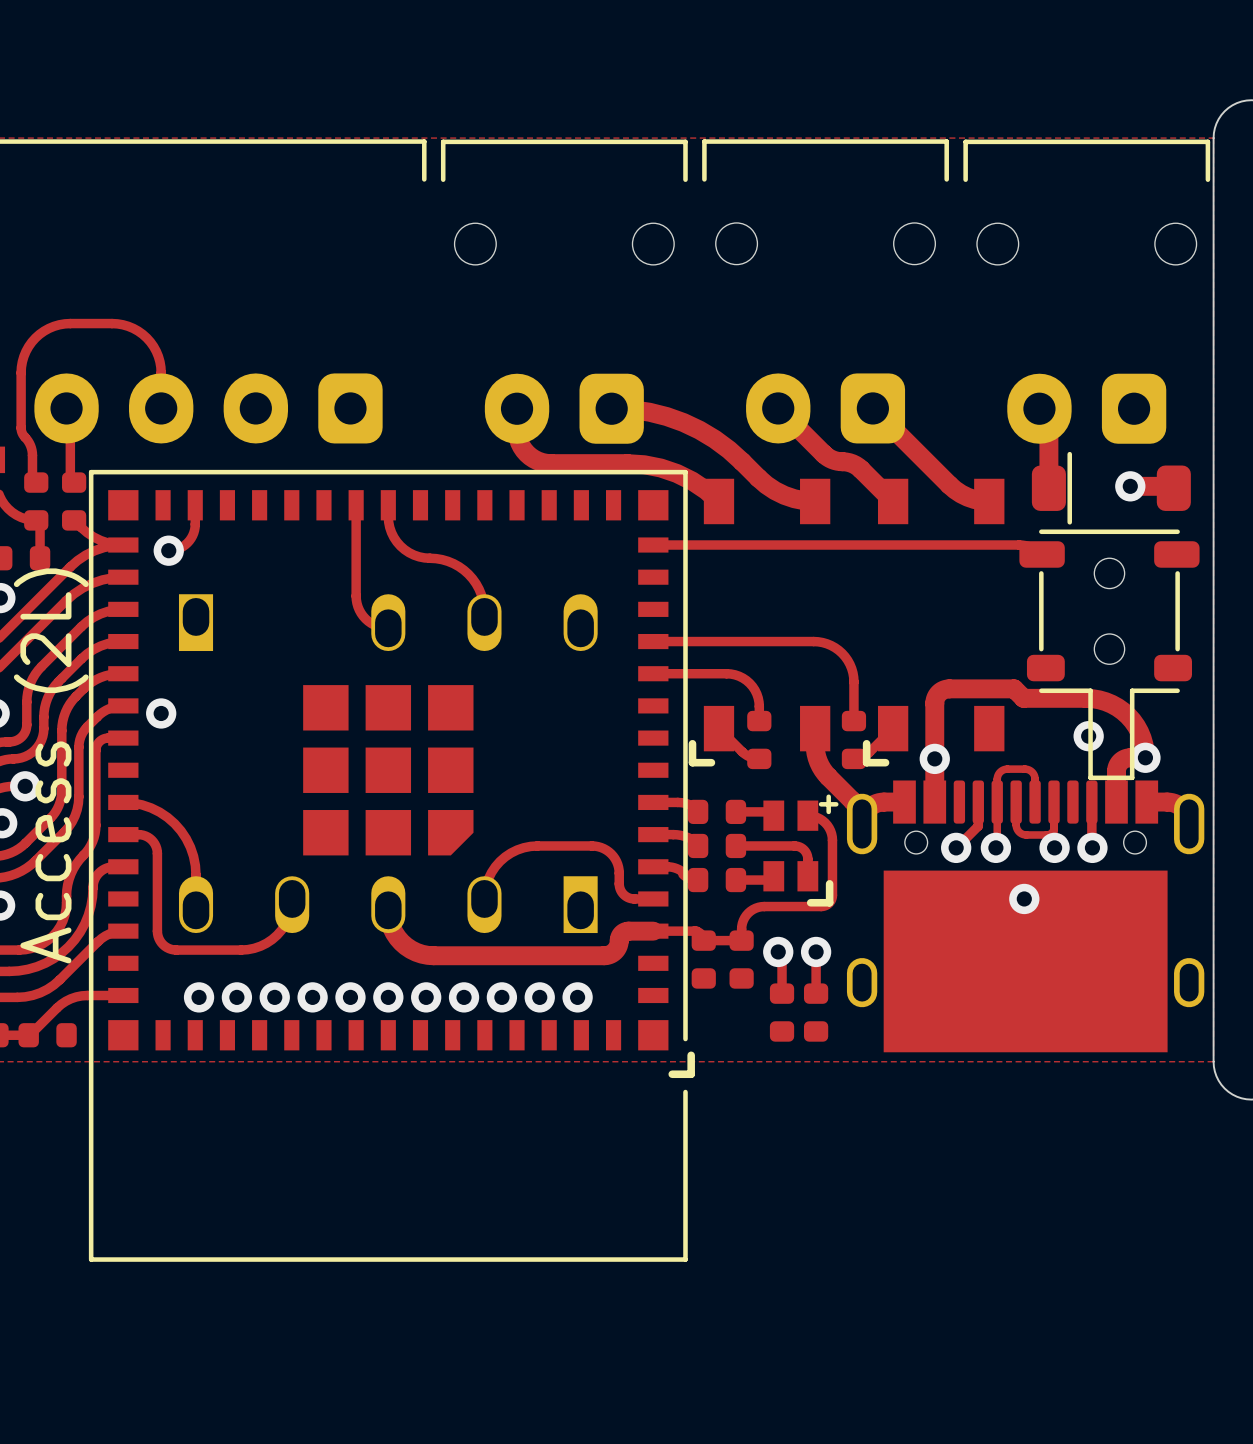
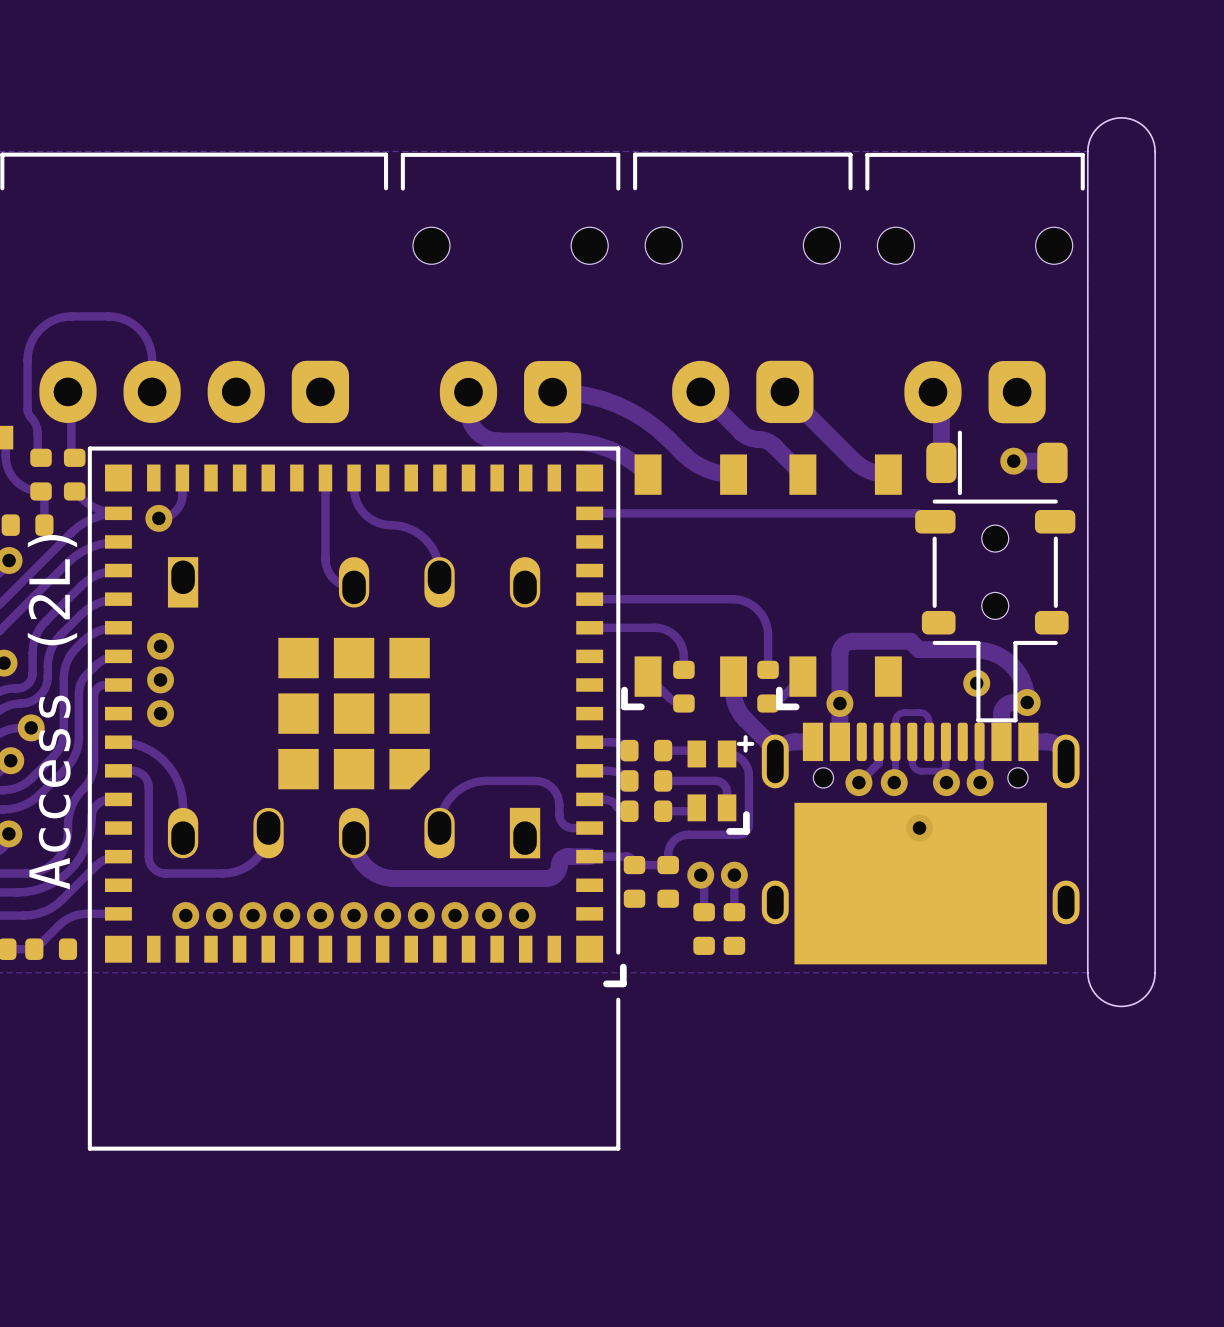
via: none -> (160, 646)
via: (161, 713) -> none
via: none -> (160, 679)
via: none -> (160, 713)

